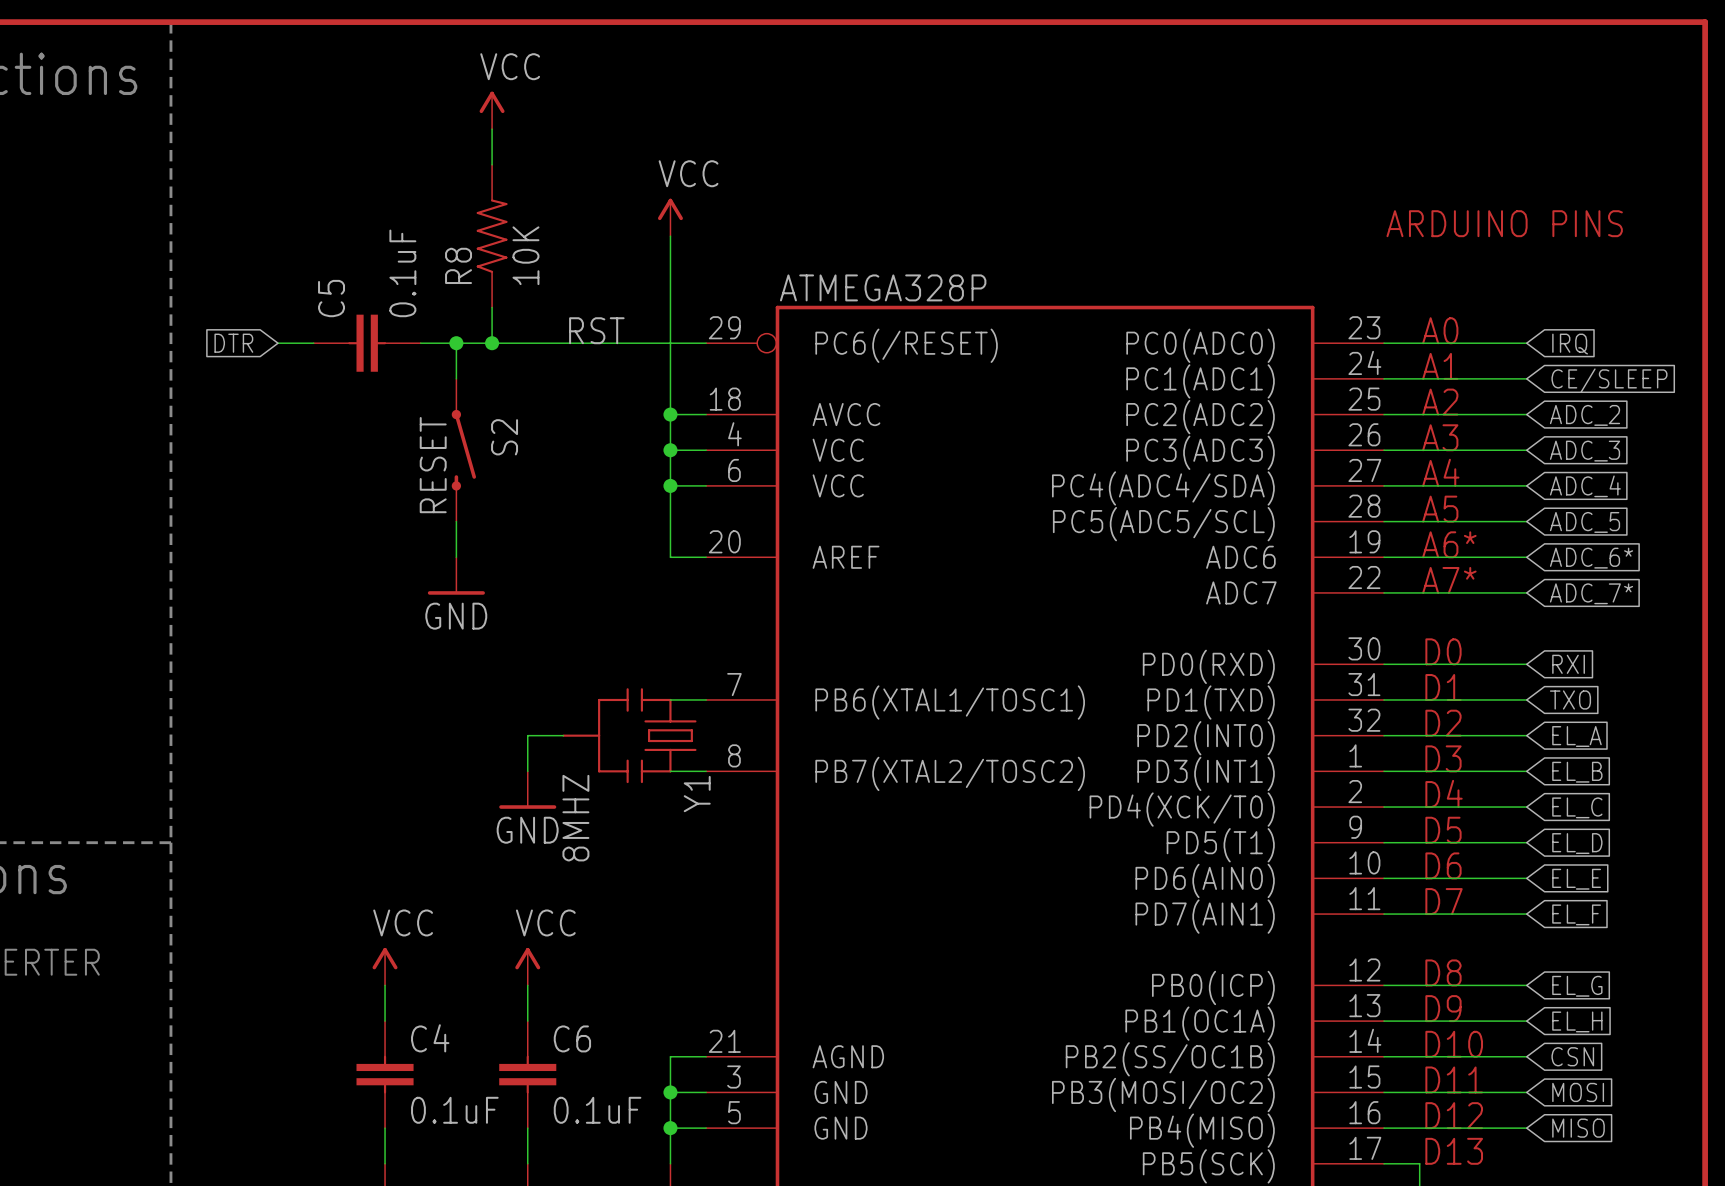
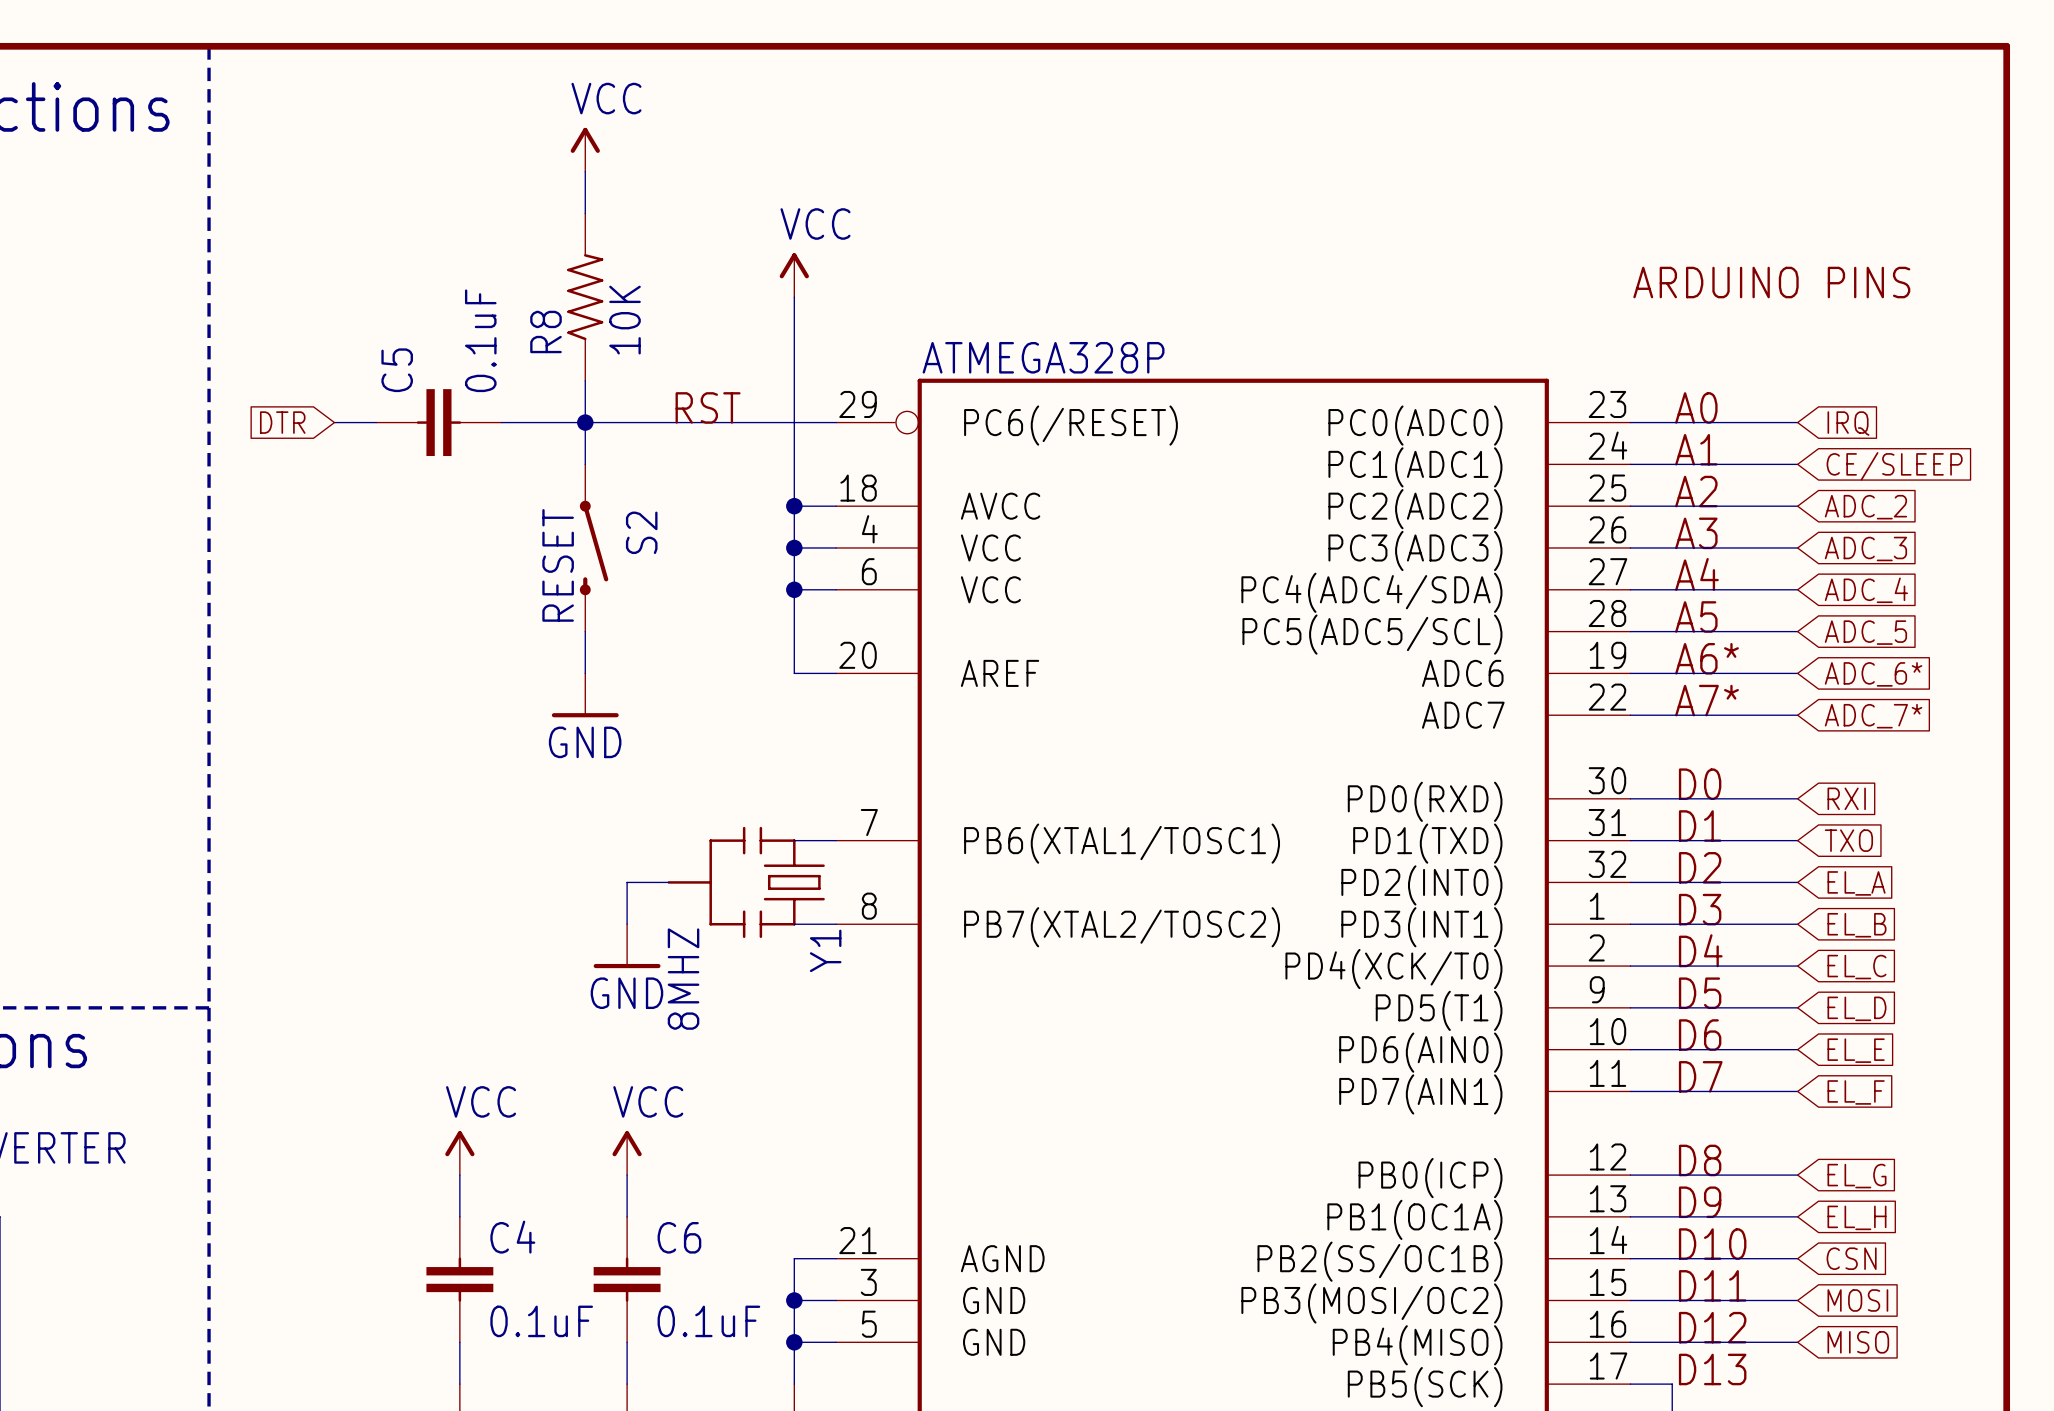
wire: (456, 343) (456, 378) -> (585, 422) (585, 464)
junction: (456, 343) -> none
S2 position: (463, 450) -> (594, 547)
wire: (456, 521) (456, 557) -> (585, 631) (585, 673)
power symbol position: GND (456, 576) -> GND (585, 695)

